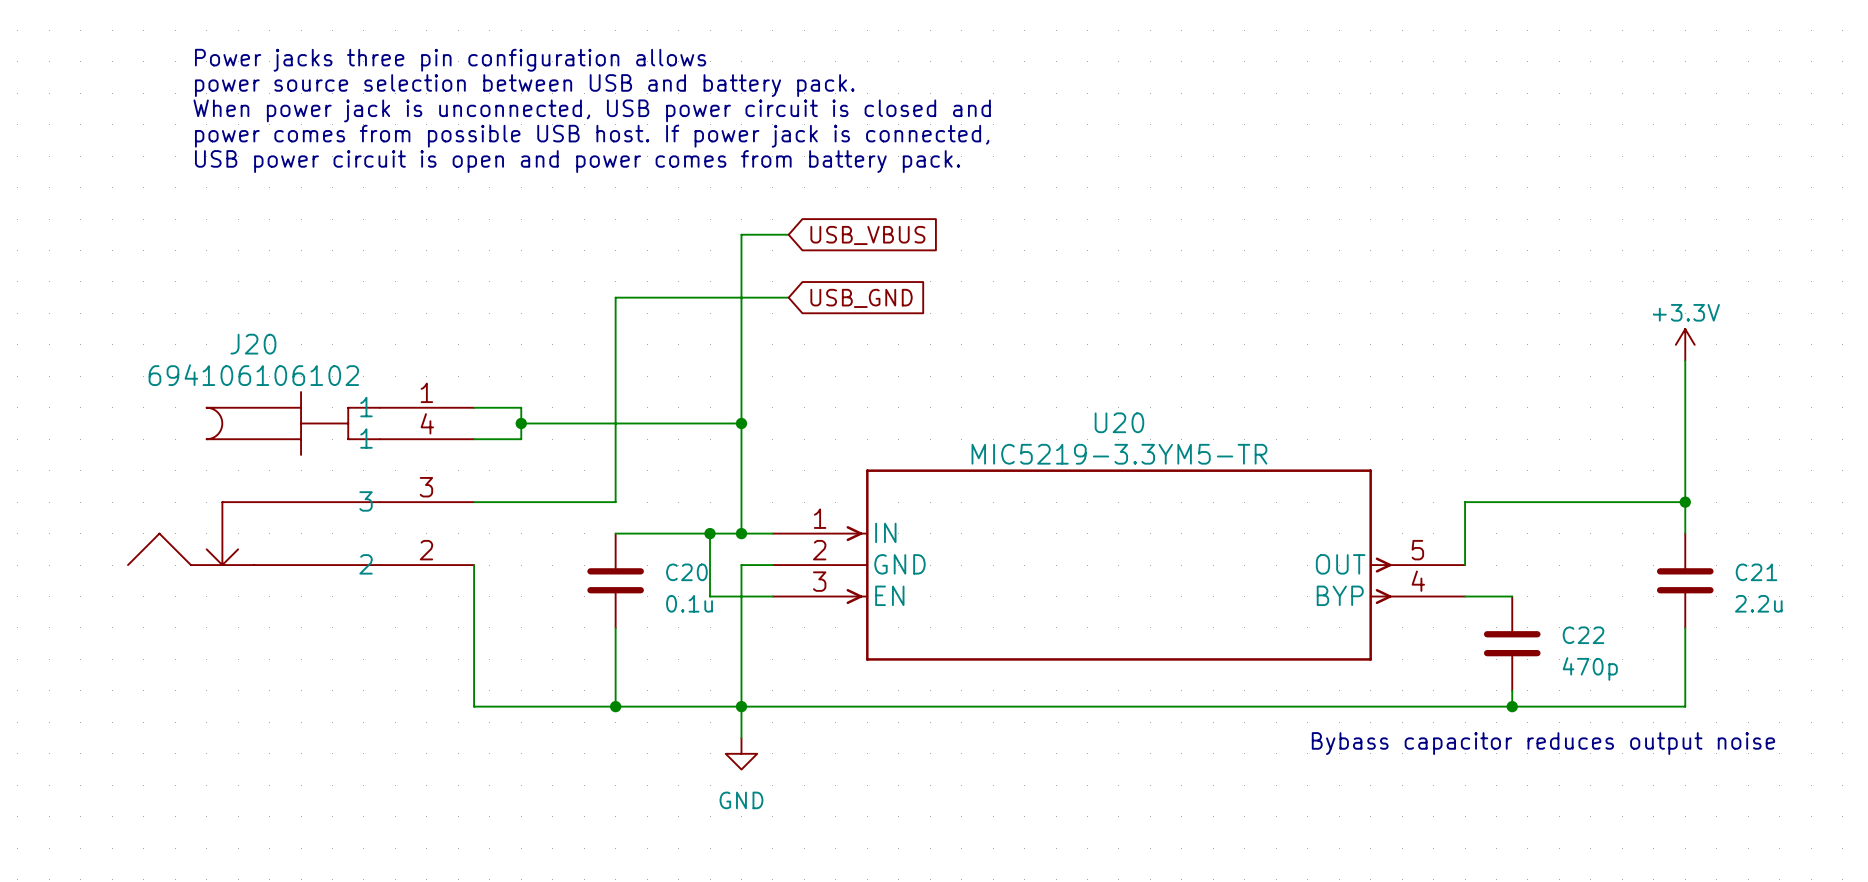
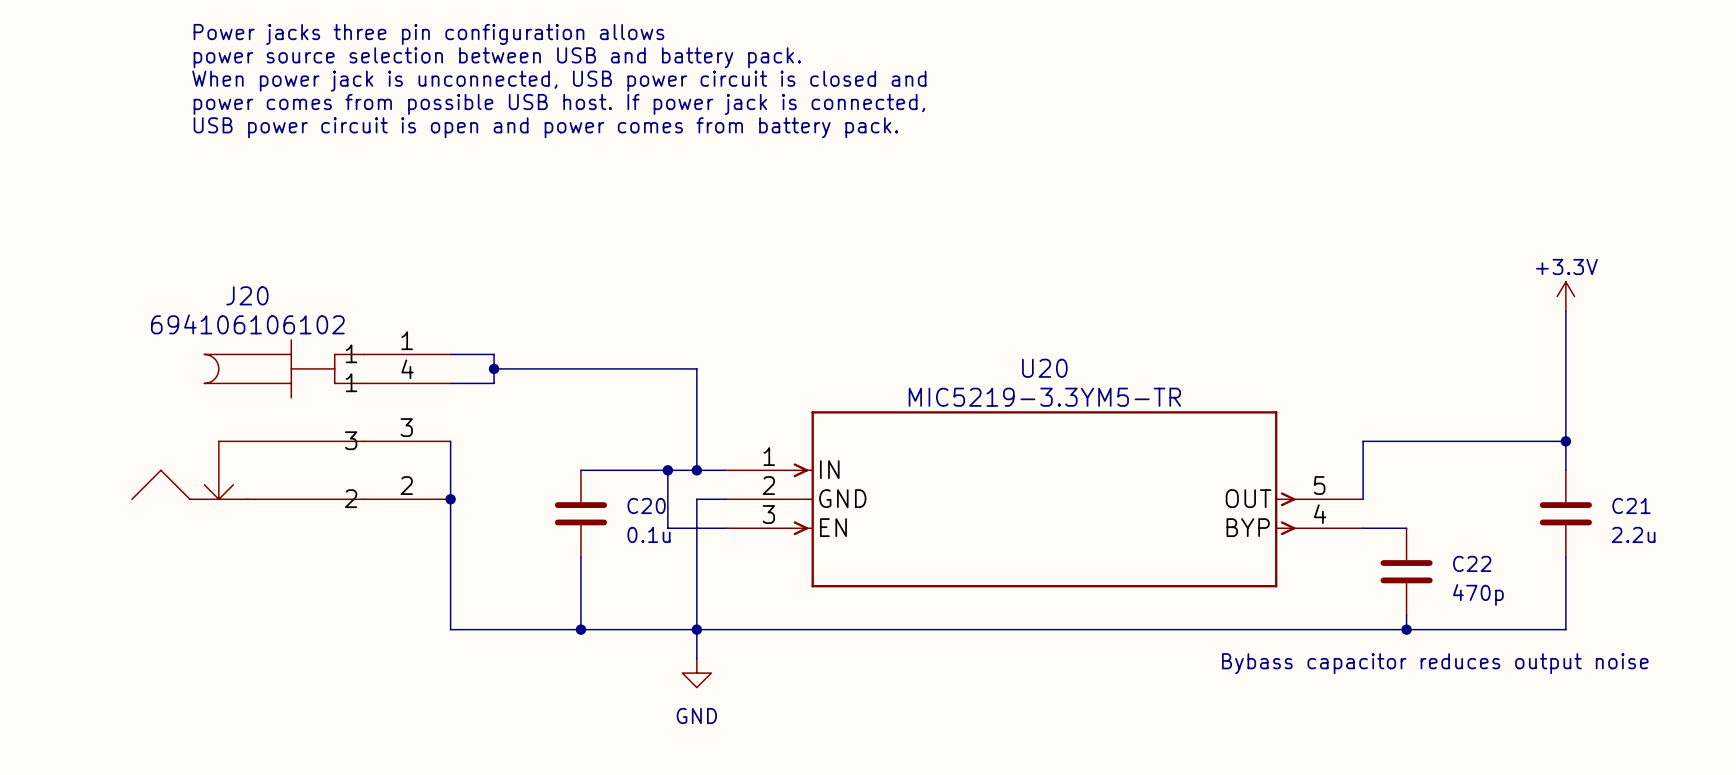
wire: (788, 234) (741, 234) (741, 423) -> none
global label: USB_VBUS (867, 235) -> none
wire: (788, 297) (615, 297) (615, 502) (474, 502) -> (450, 499) (450, 441)
global label: USB_GND (861, 298) -> none
junction: (741, 423) -> none
junction: none -> (450, 499)

